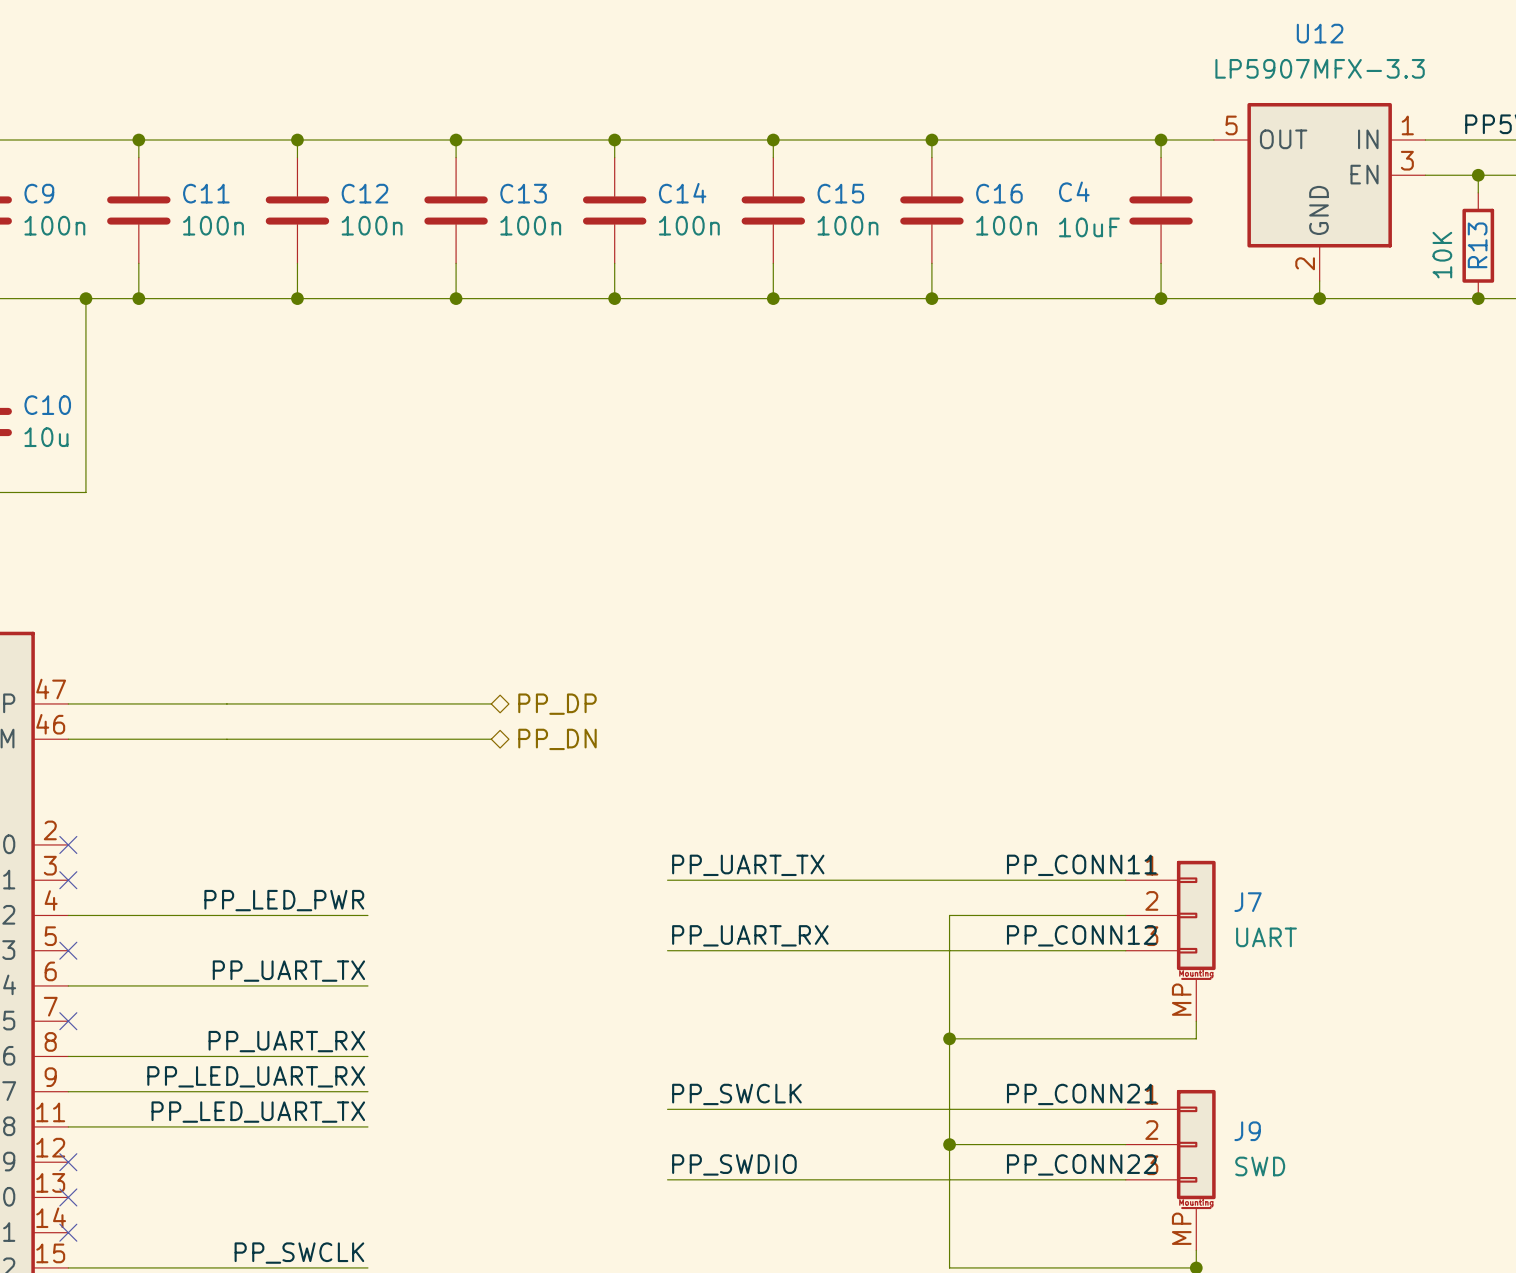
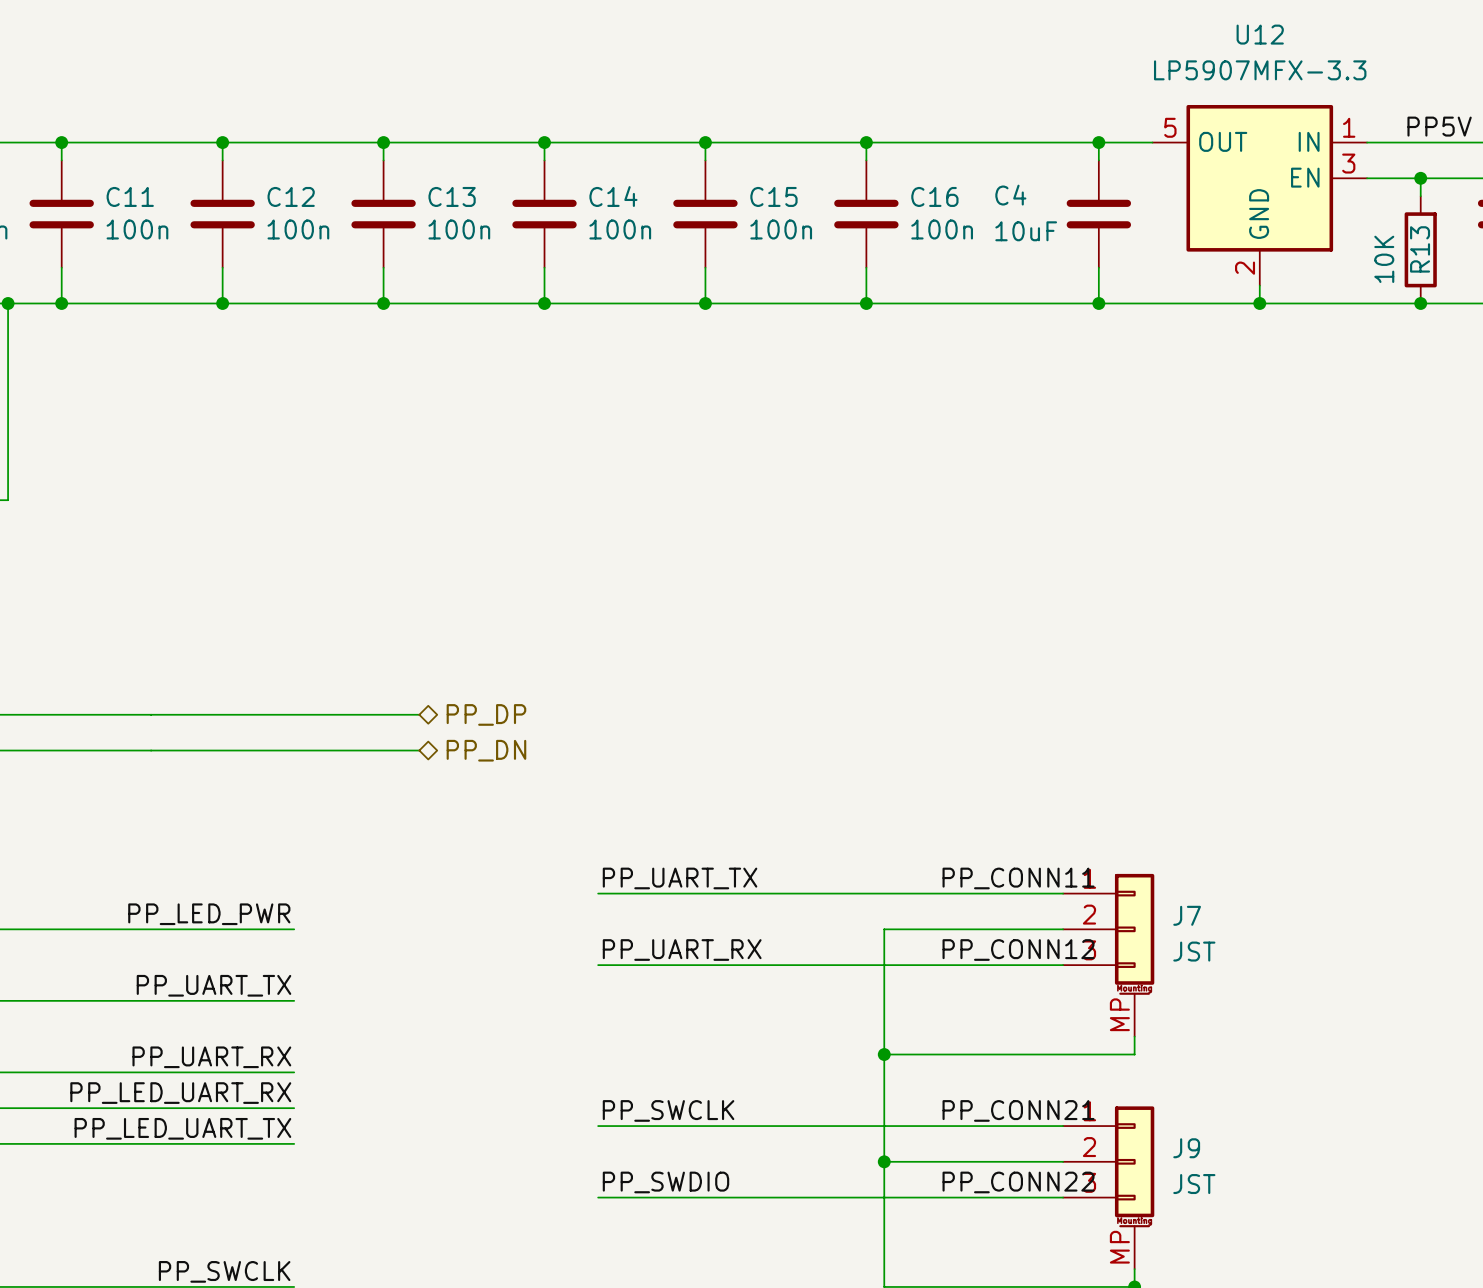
J7 value: UART (1266, 937) -> JST (1194, 951)
J9 value: SWD (1260, 1166) -> JST (1194, 1184)

